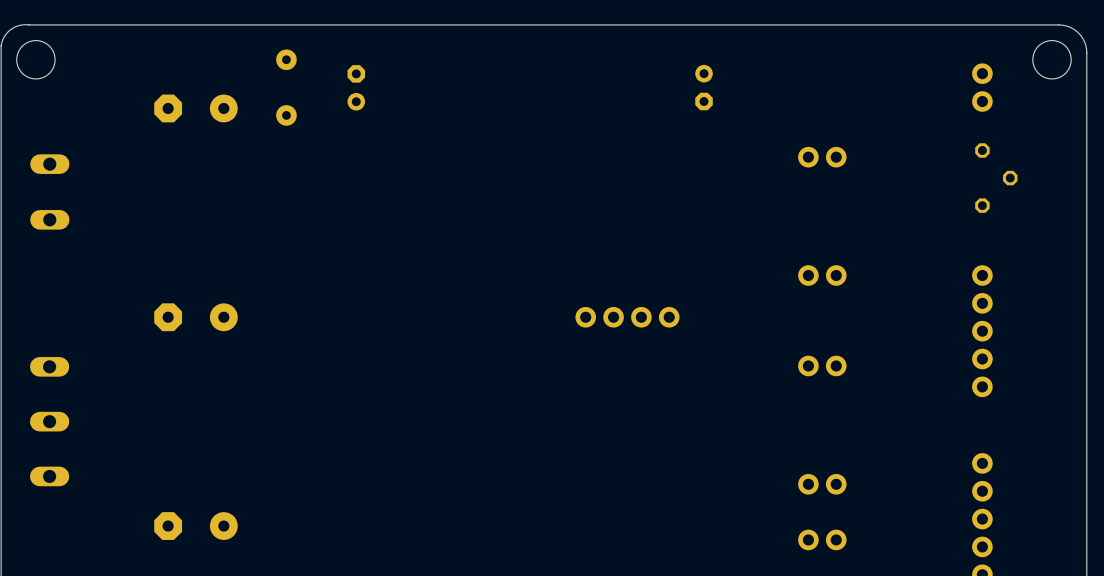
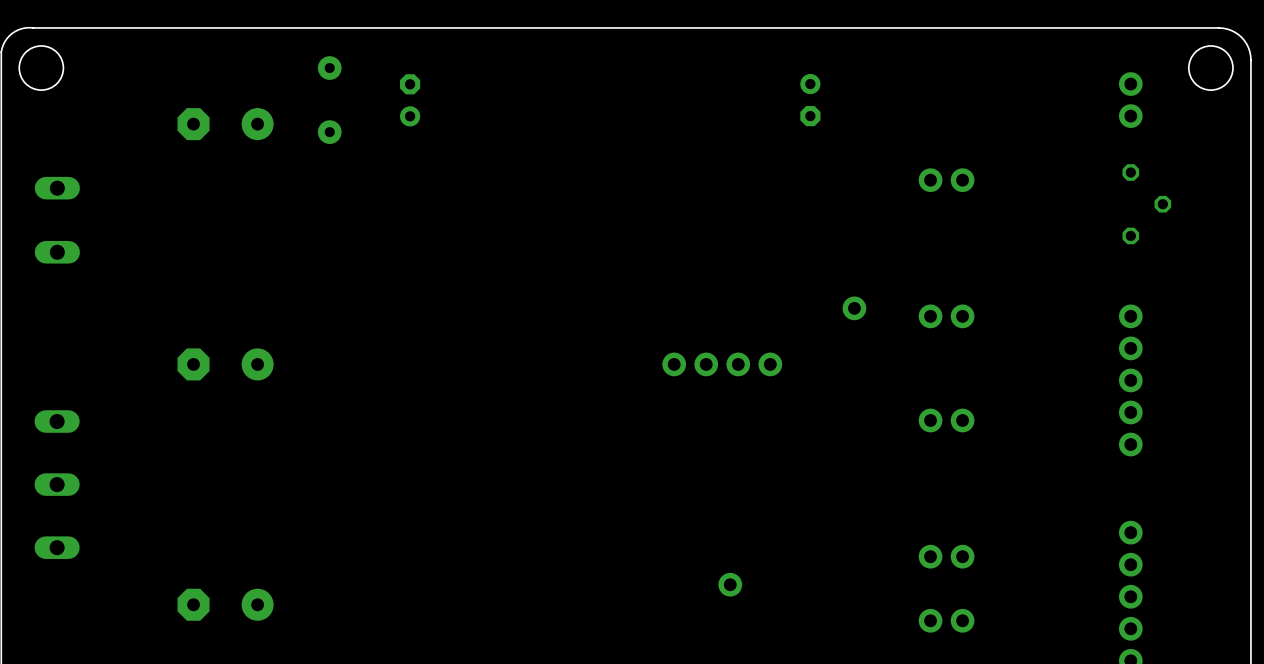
part: none -> (854, 308)
part: none -> (730, 584)

